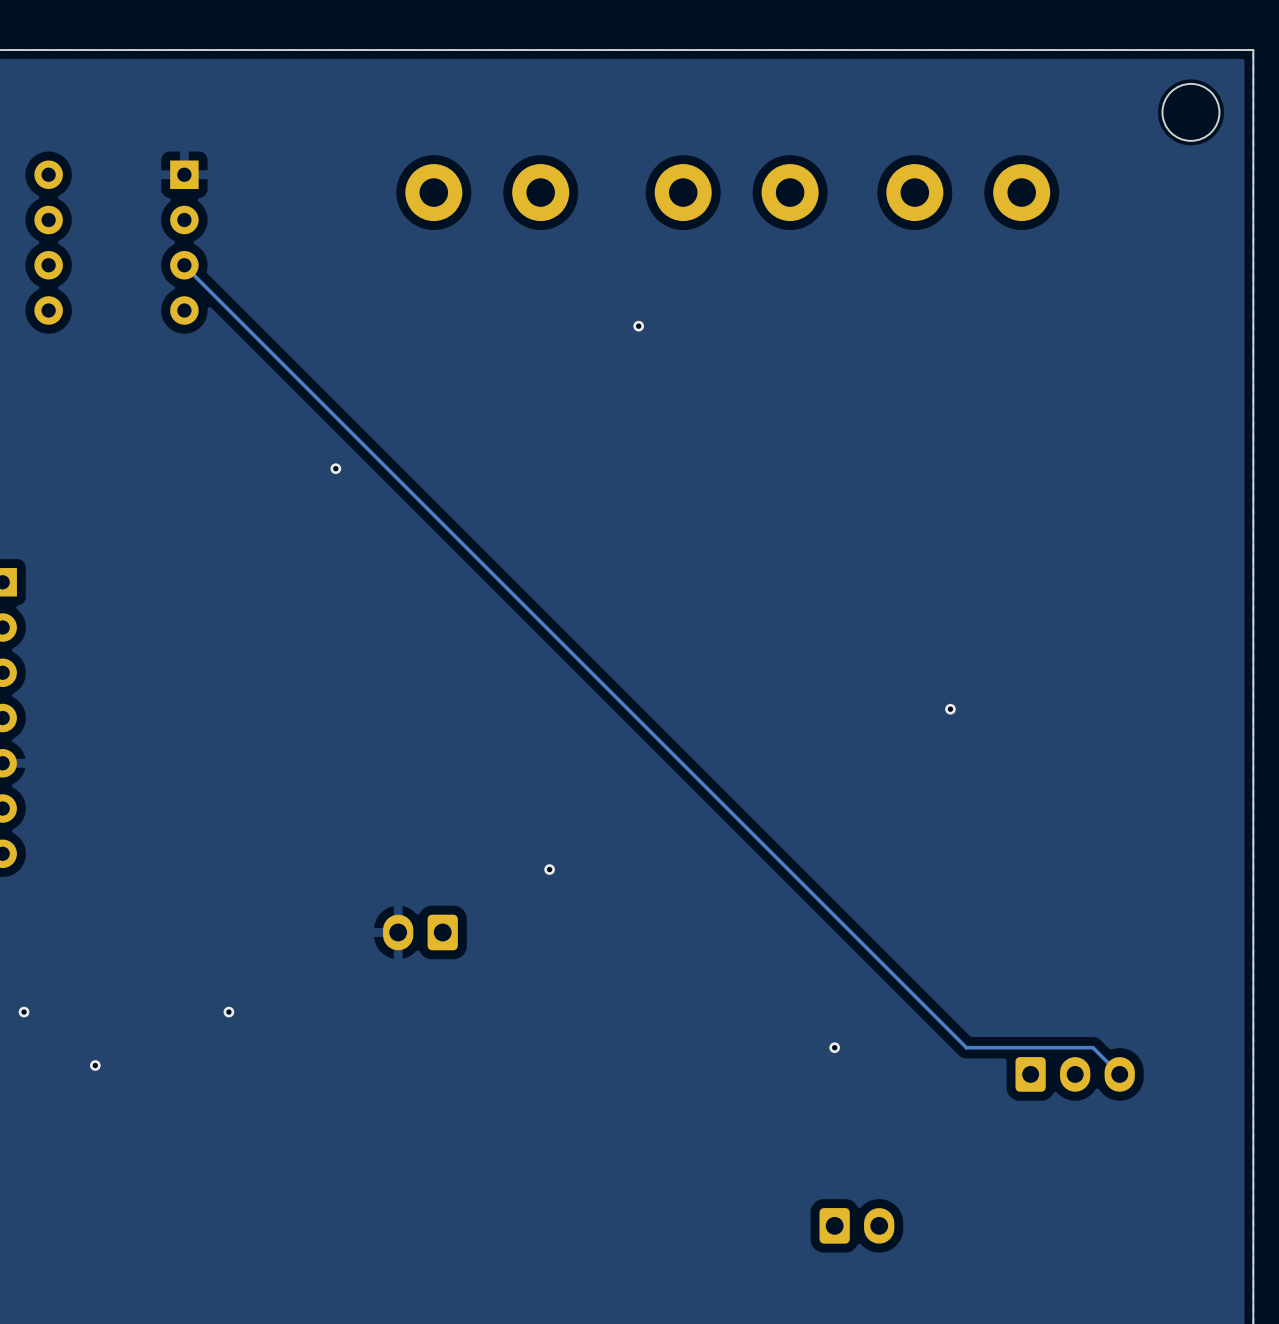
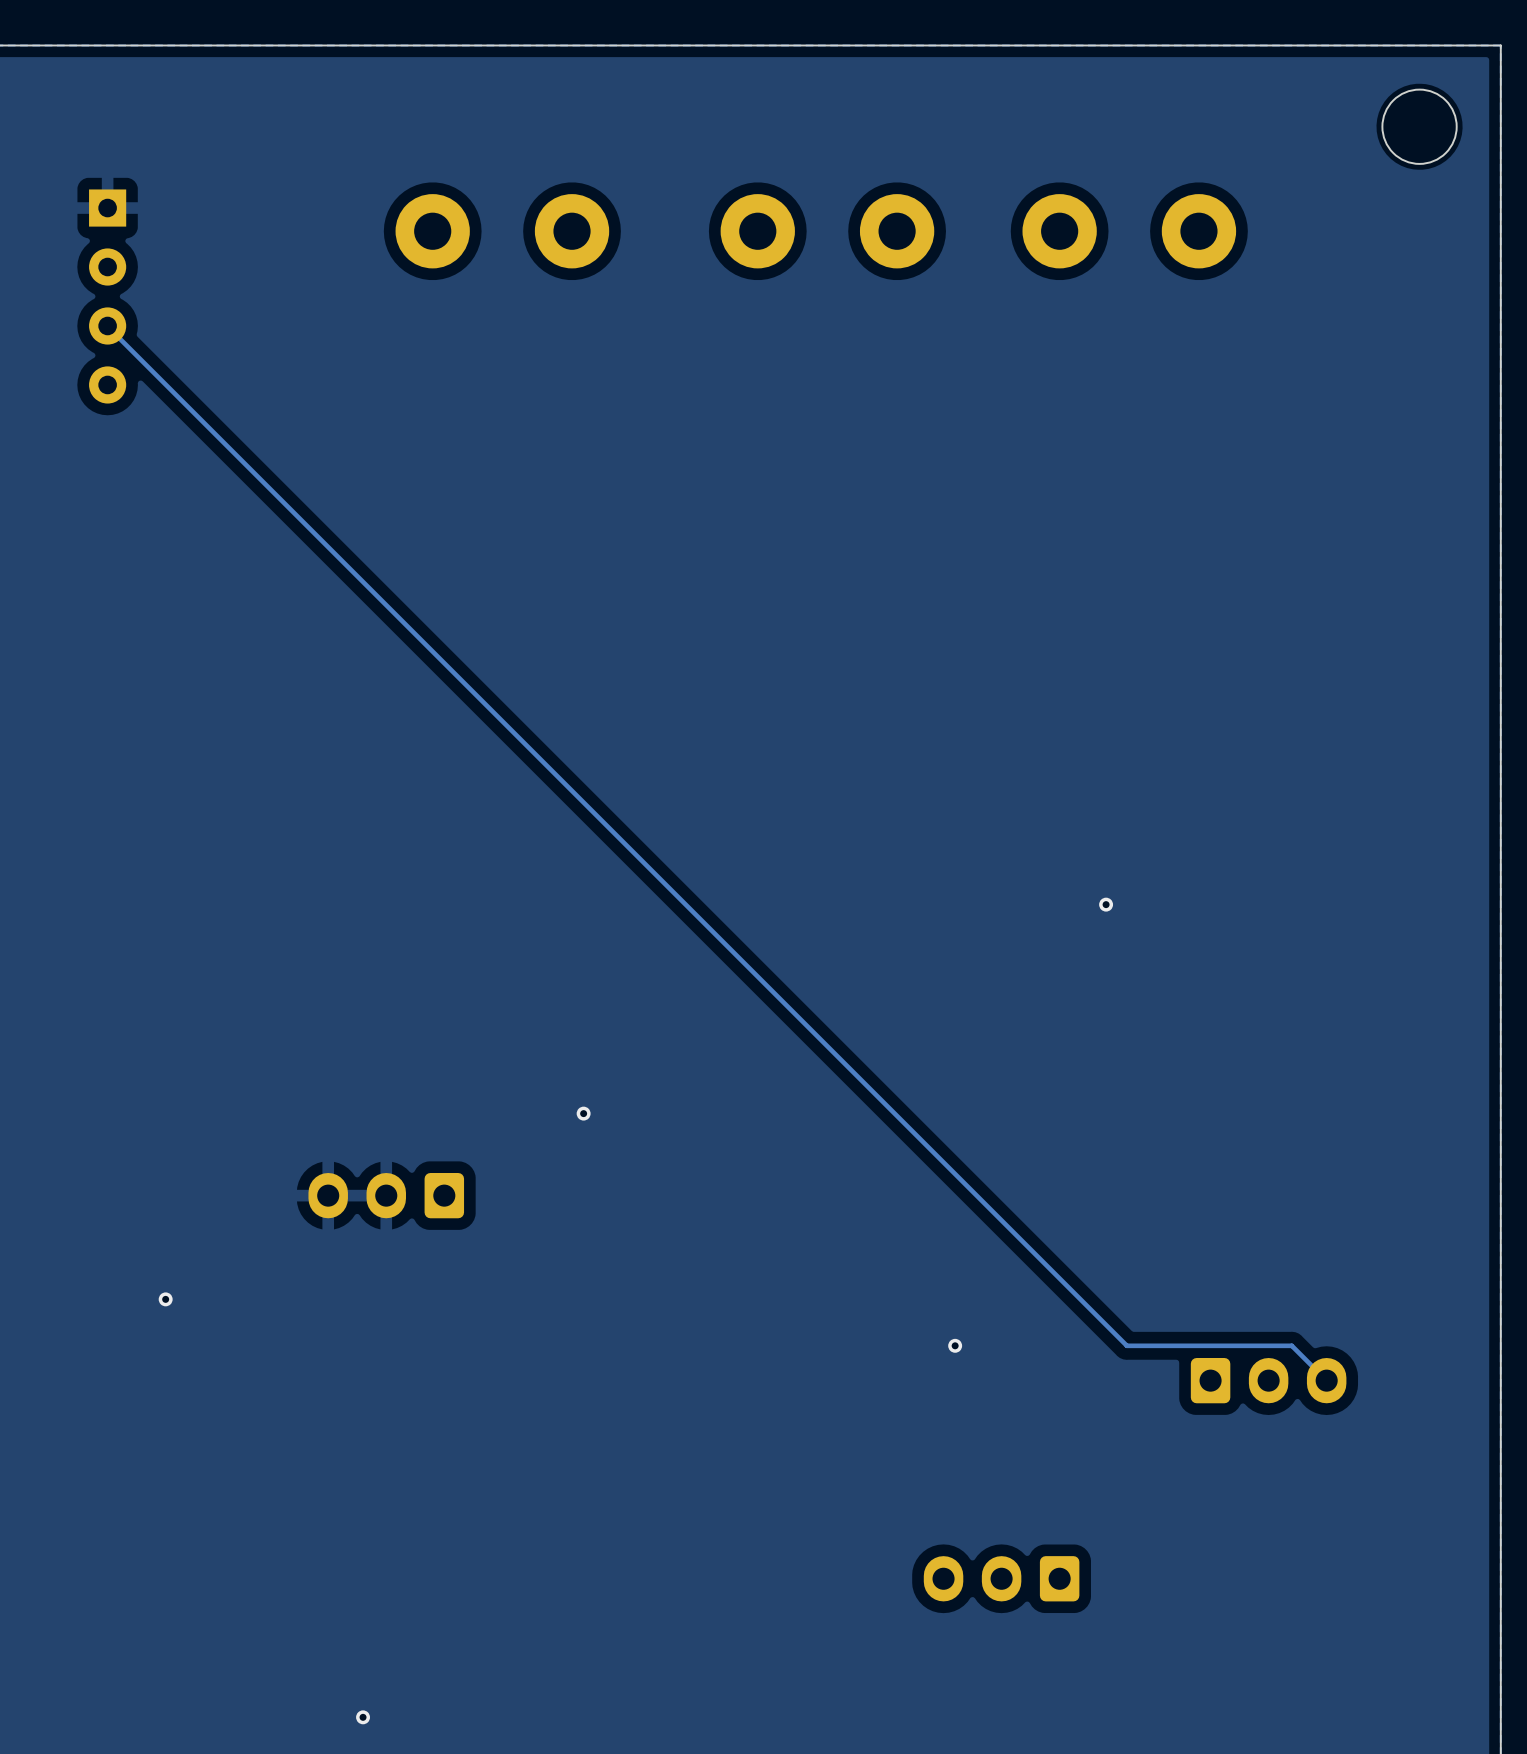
via: (638, 326) -> none
via: (335, 468) -> none
part: none -> (386, 1195)
part: (420, 932) -> none
part footprint: [819, 1208, 895, 1244] -> [923, 1556, 1080, 1602]

